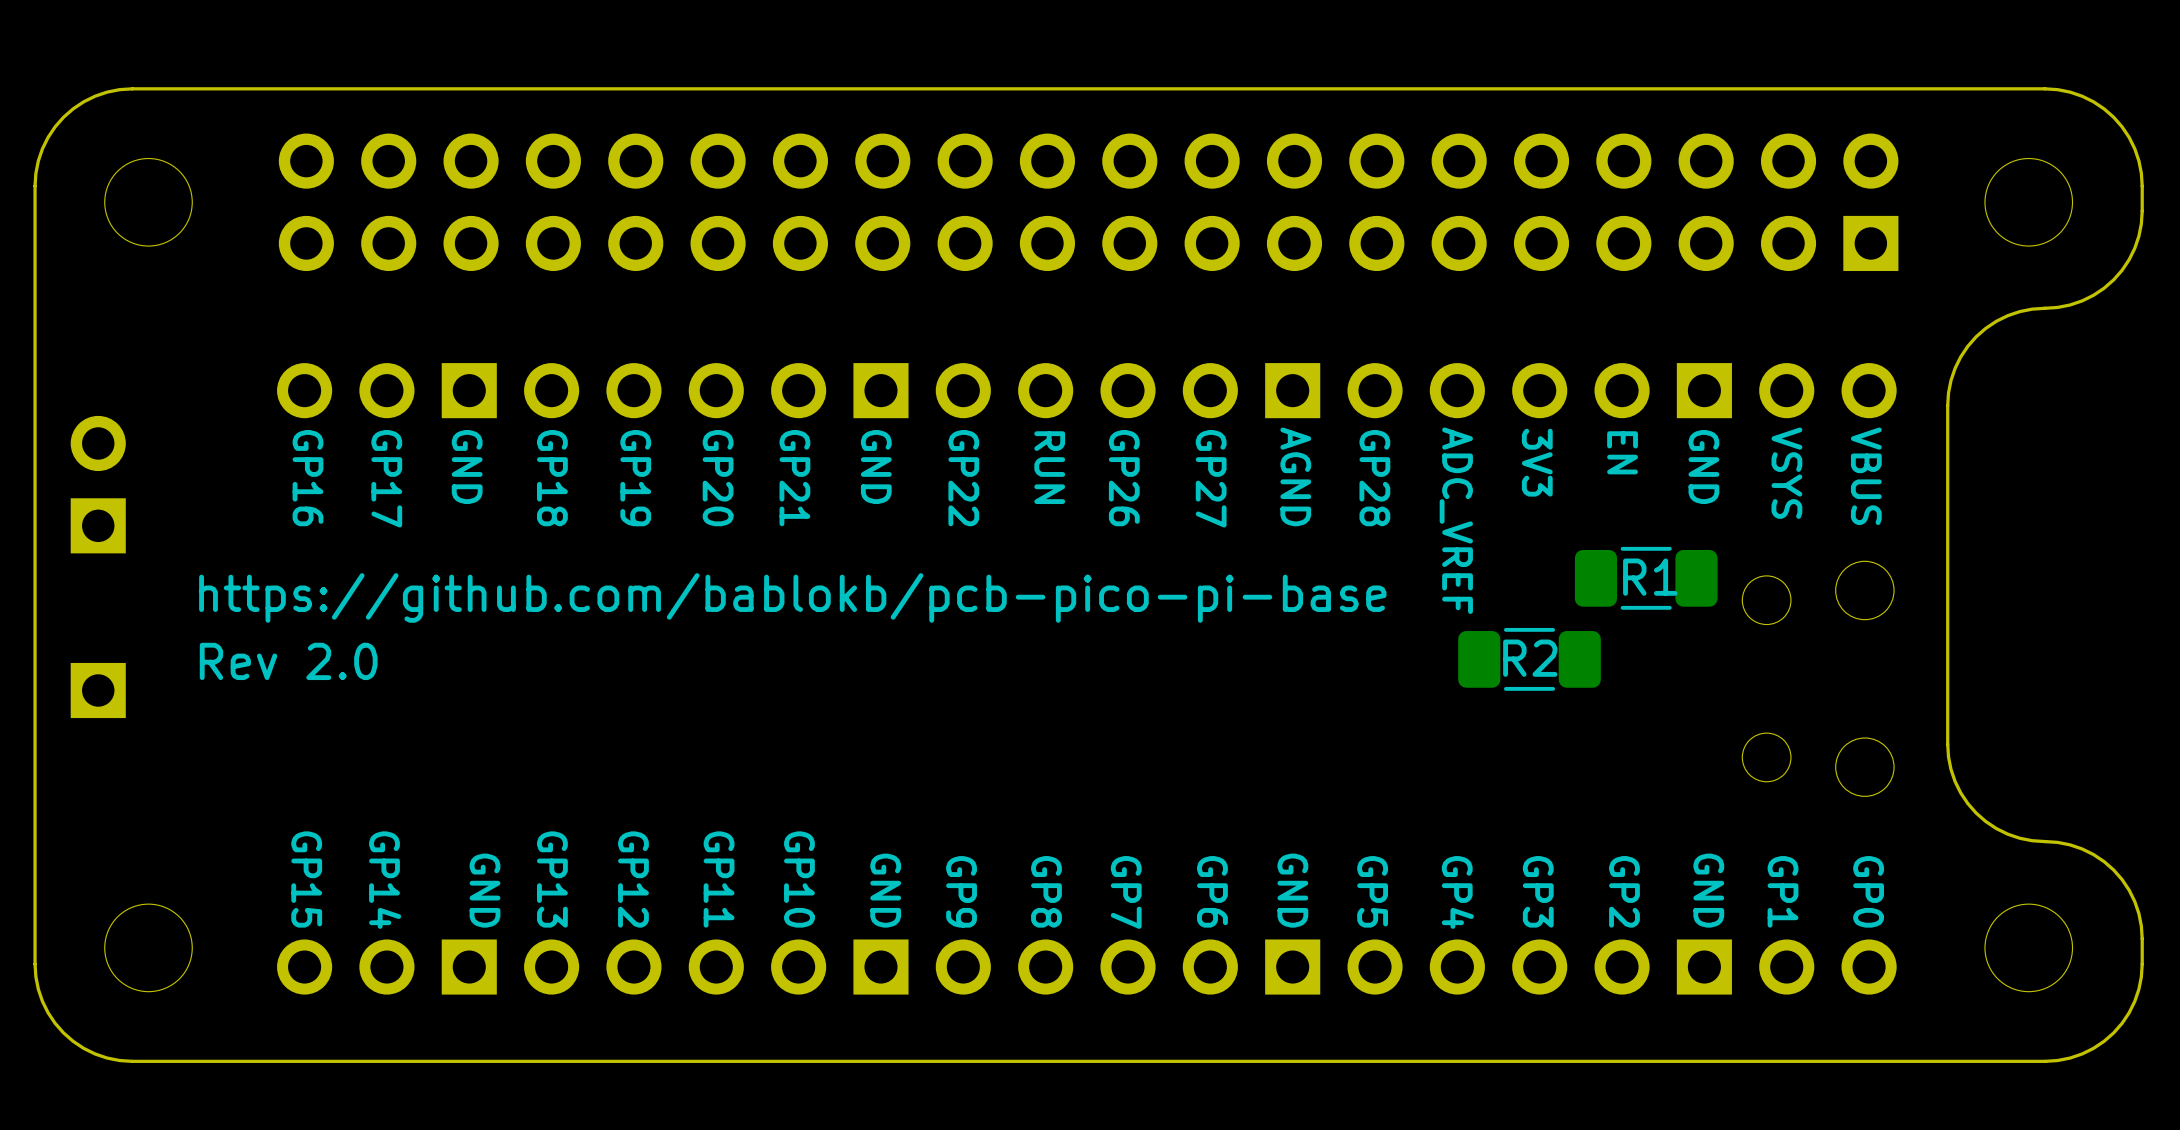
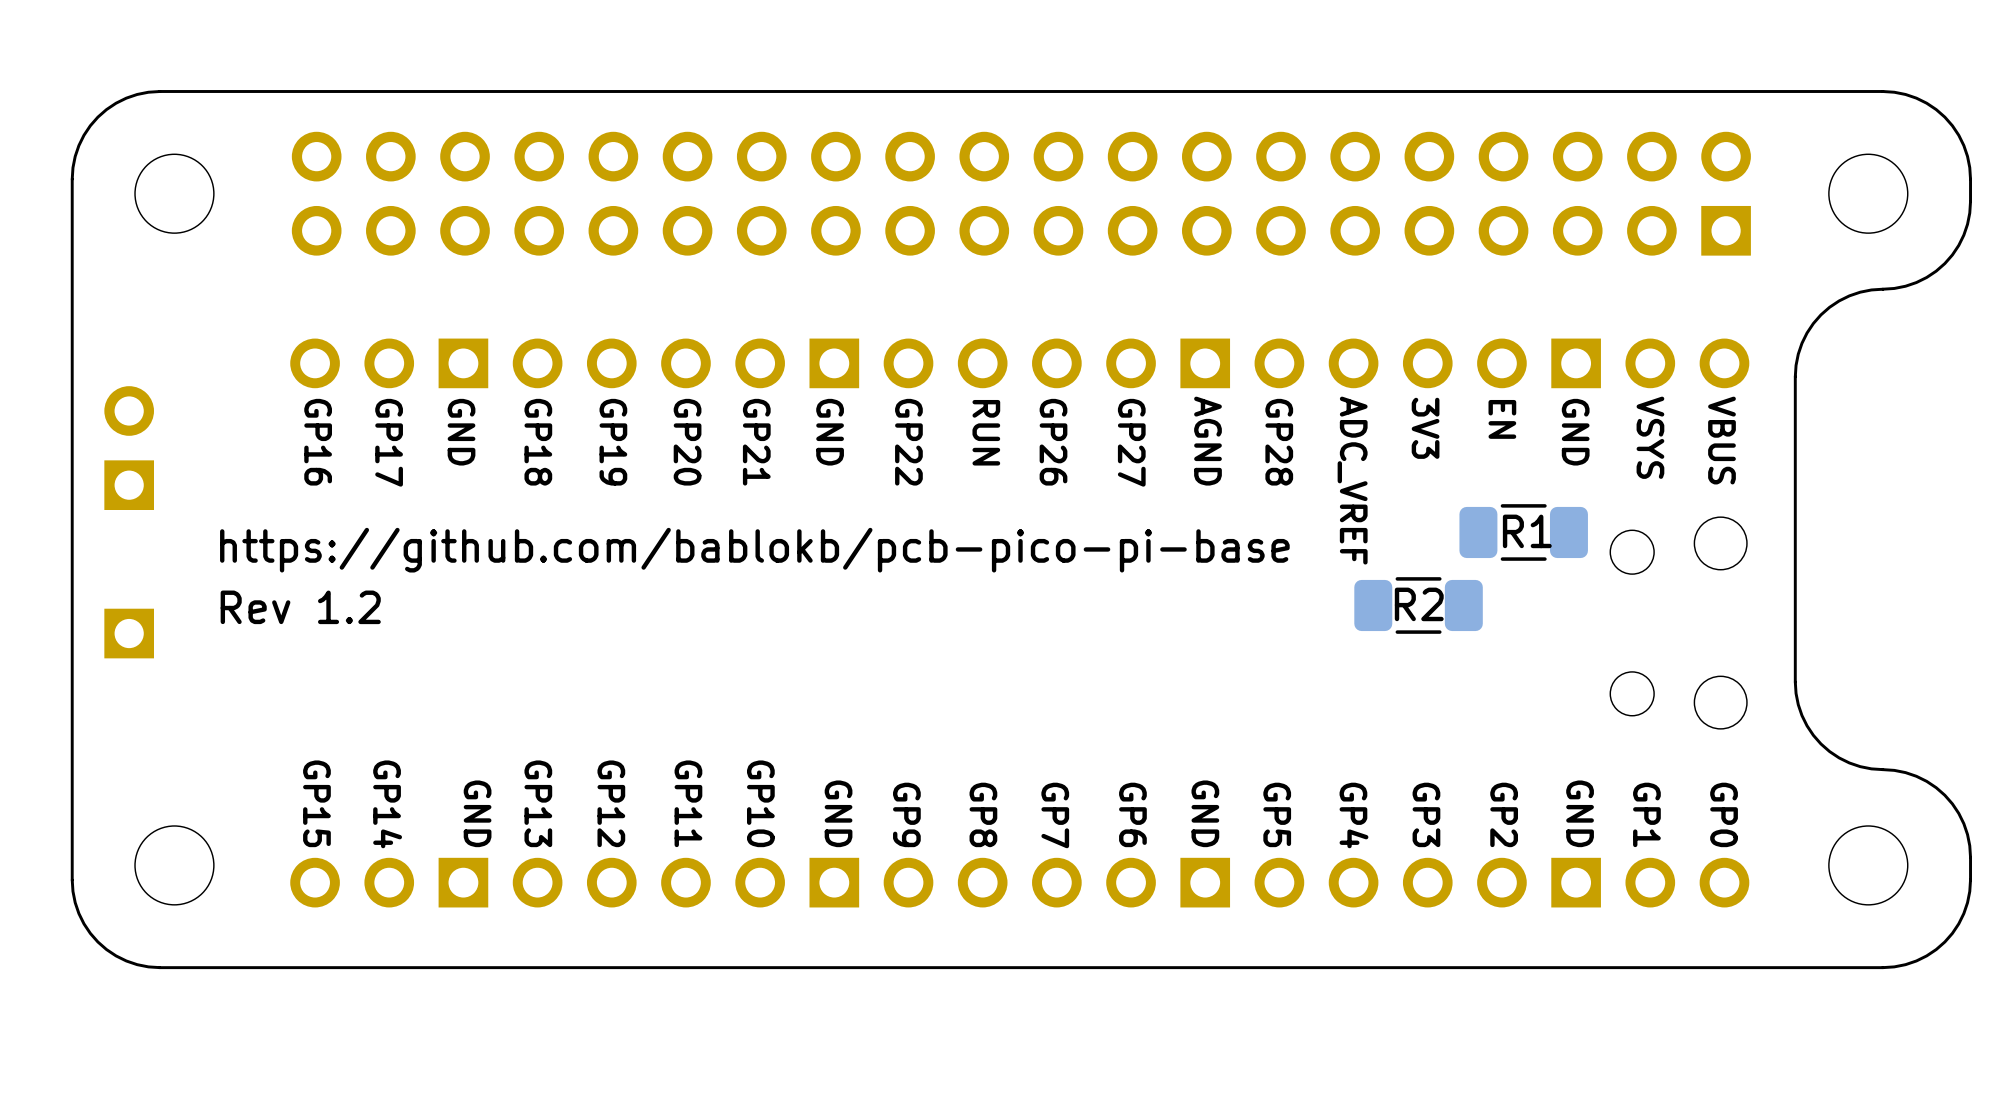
text: Rev 2.0 (288, 661) -> Rev 1.2 (300, 607)

